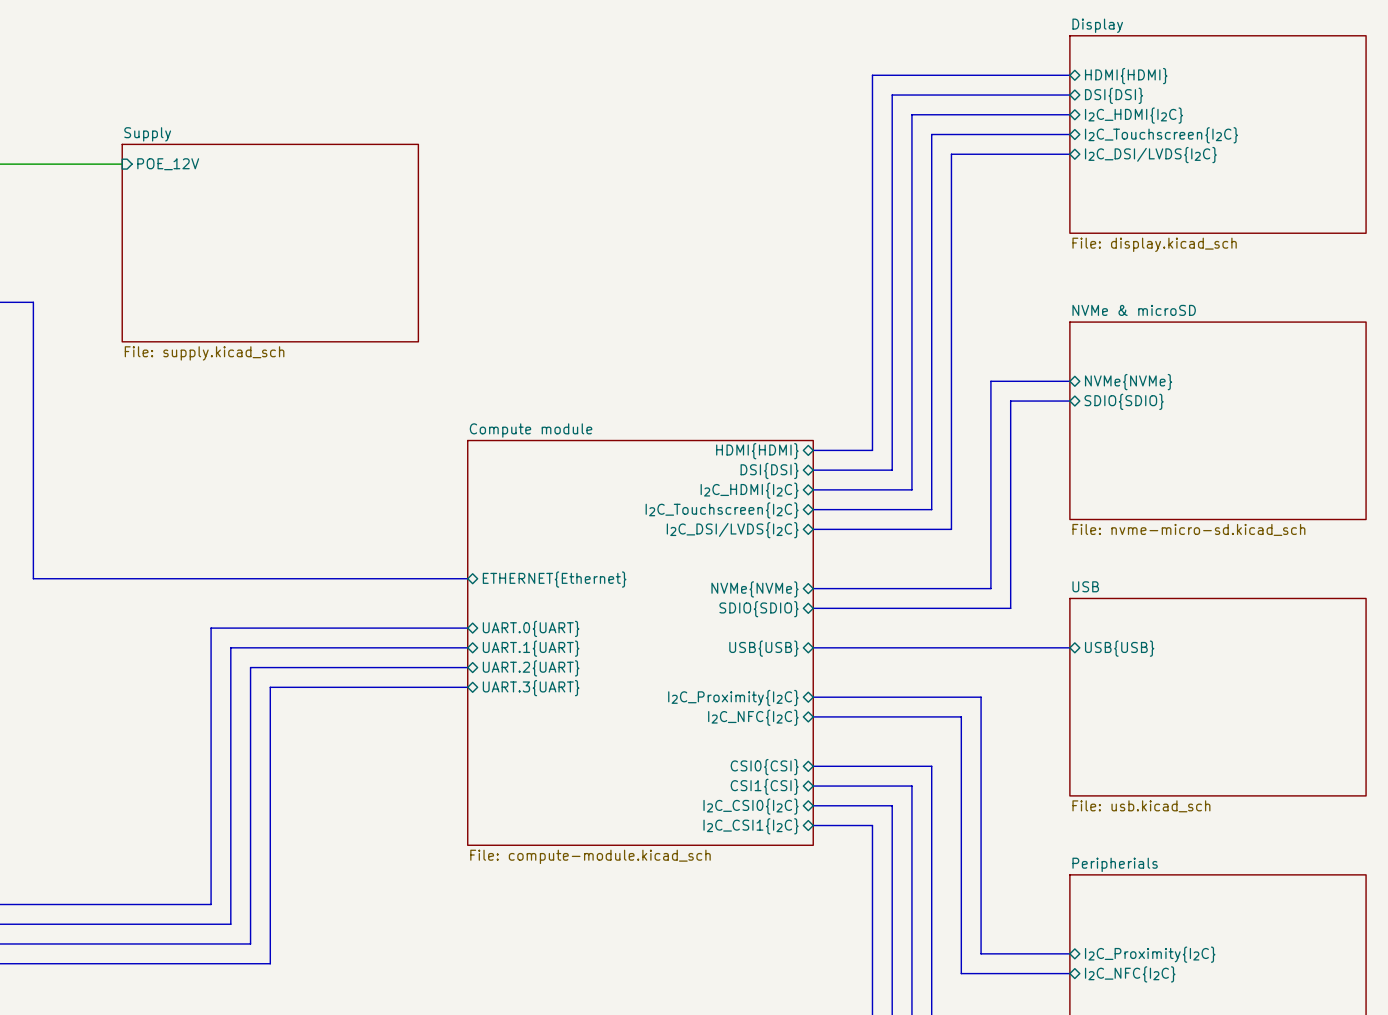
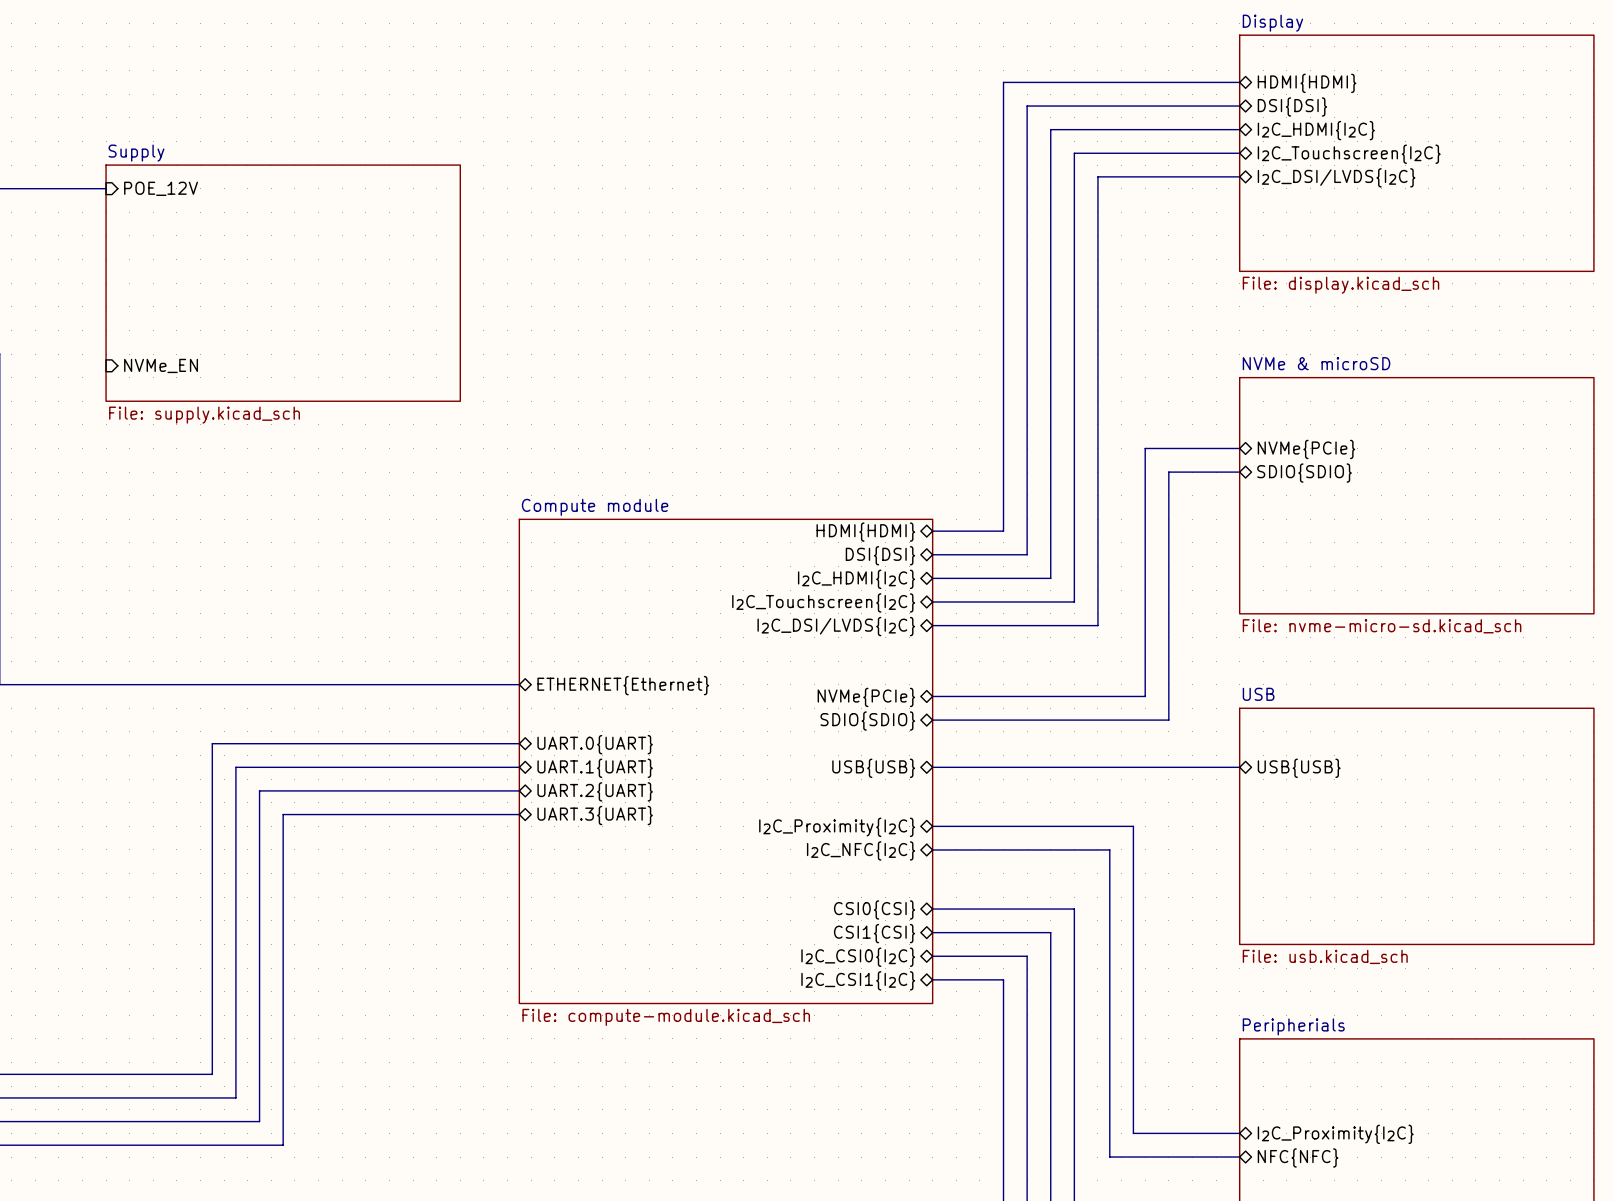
sheet pin: none -> NVMe_EN (161, 365)
sheet pin: NVMe{NVMe} (1128, 382) -> NVMe{PCIe} (1306, 449)
sheet pin: NVMe{NVMe} (755, 589) -> NVMe{PCIe} (866, 697)
sheet pin: I2C_NFC{I2C} (1130, 974) -> NFC{NFC} (1298, 1157)

